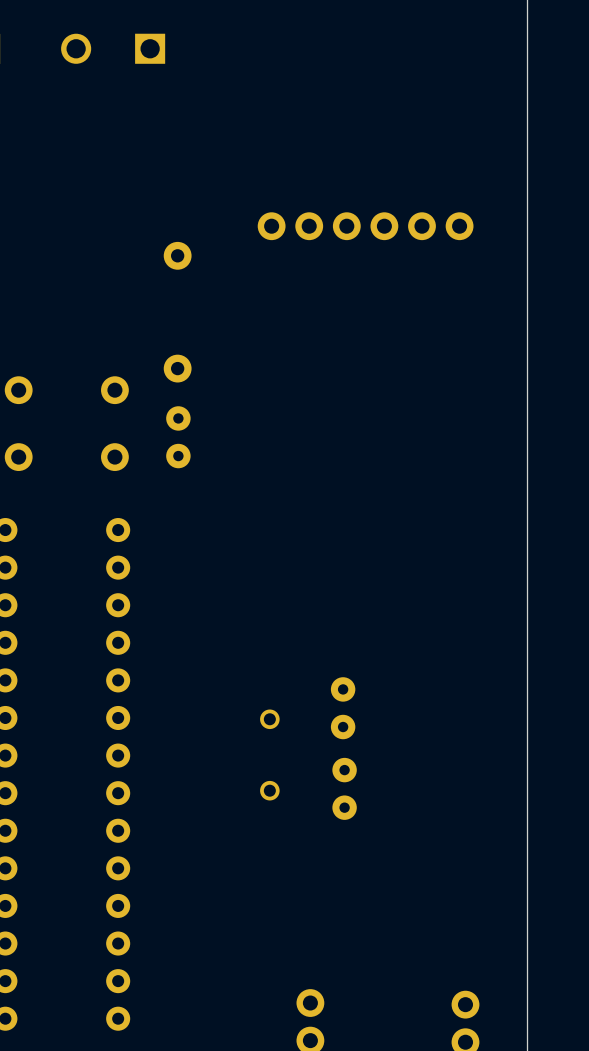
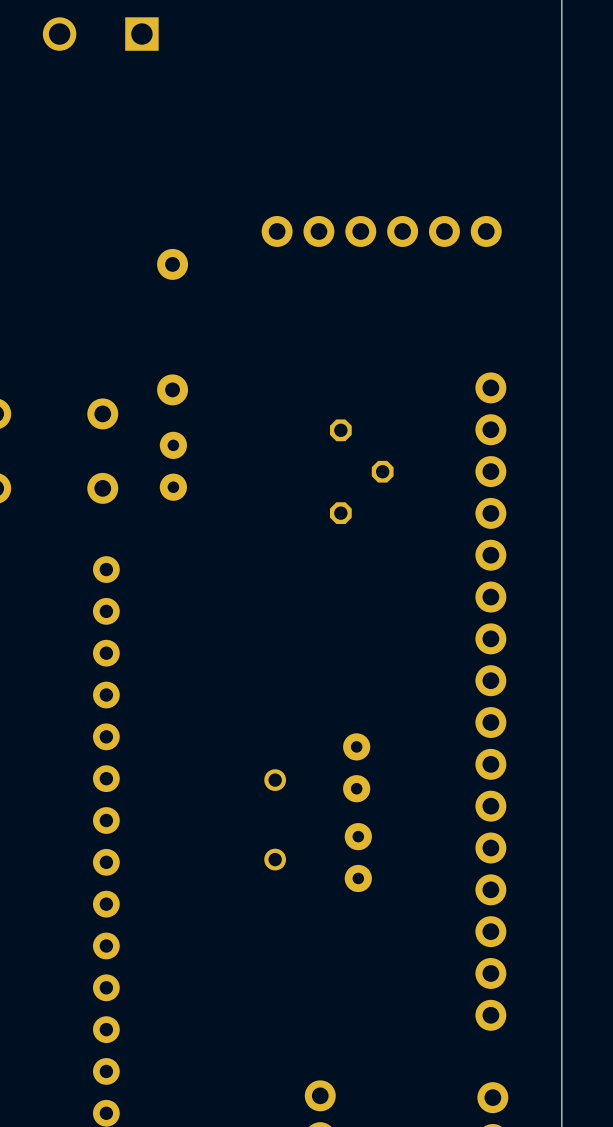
part: none -> (361, 471)
part: none -> (490, 701)

